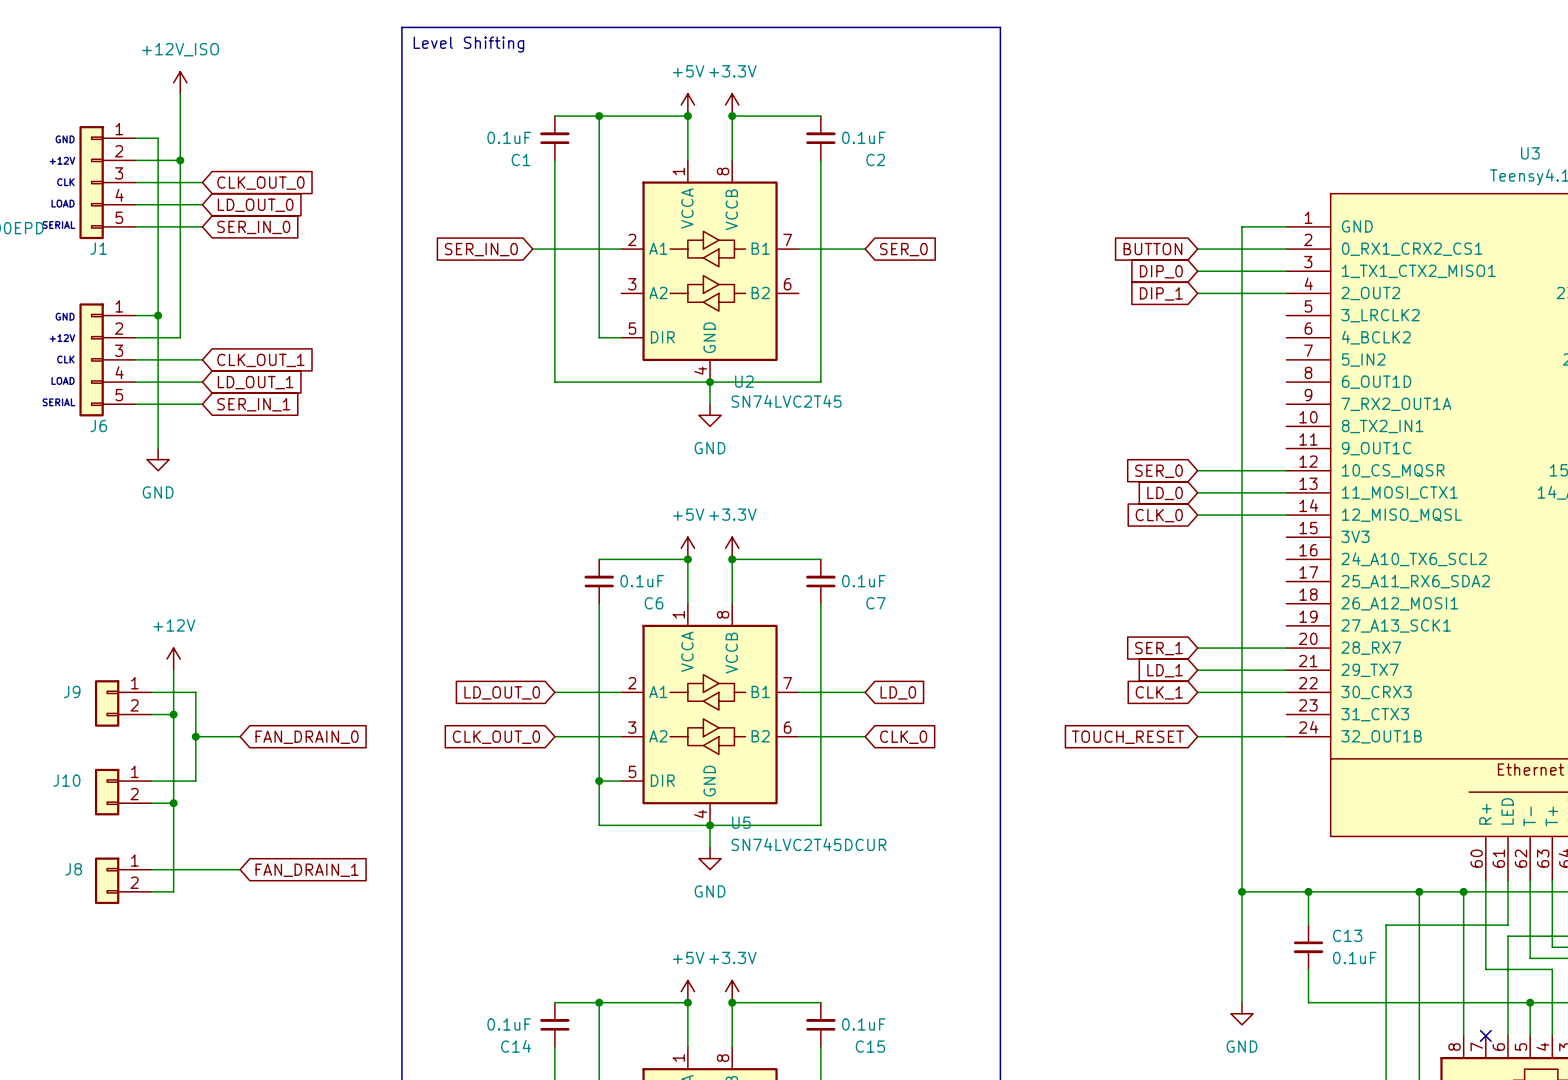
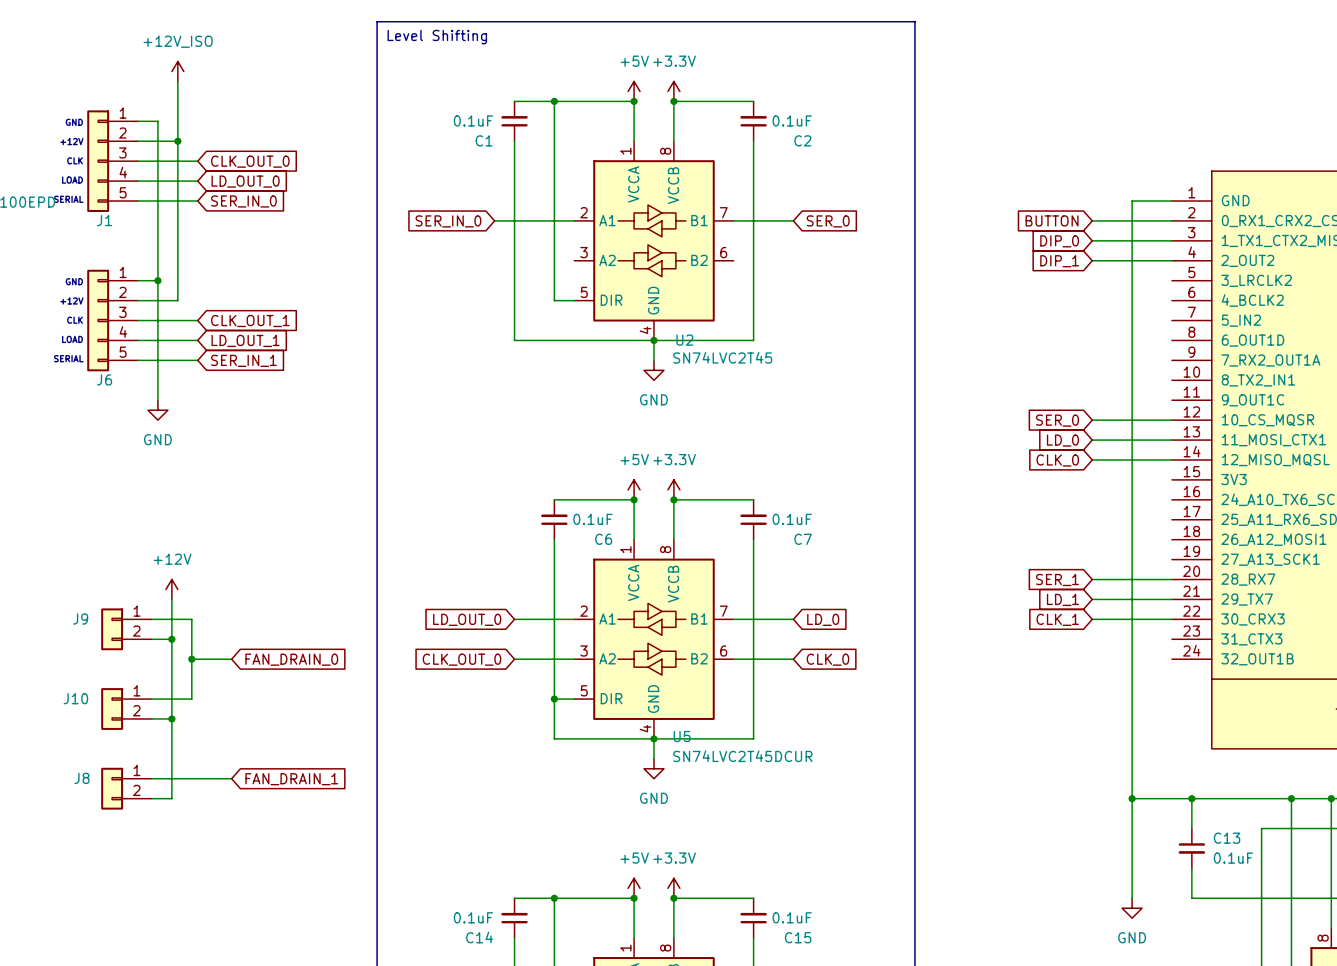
wire: (1197, 736) (1286, 736) -> none
global label: TOUCH_RESET (1127, 737) -> none

